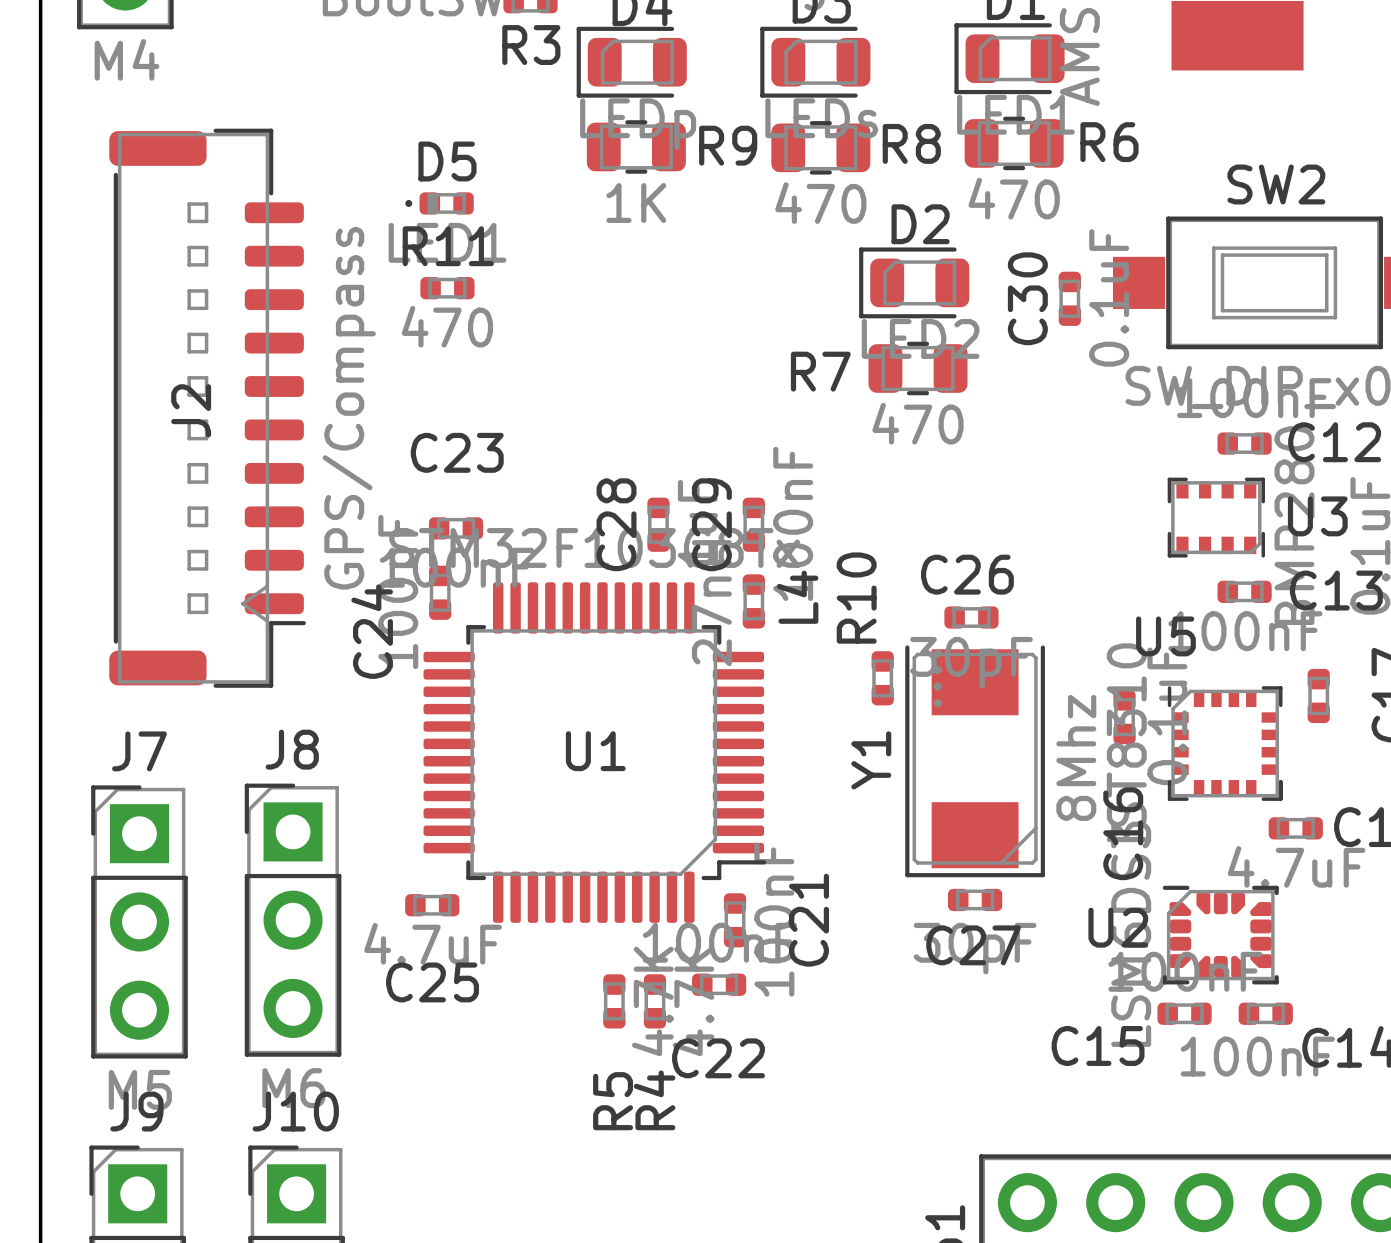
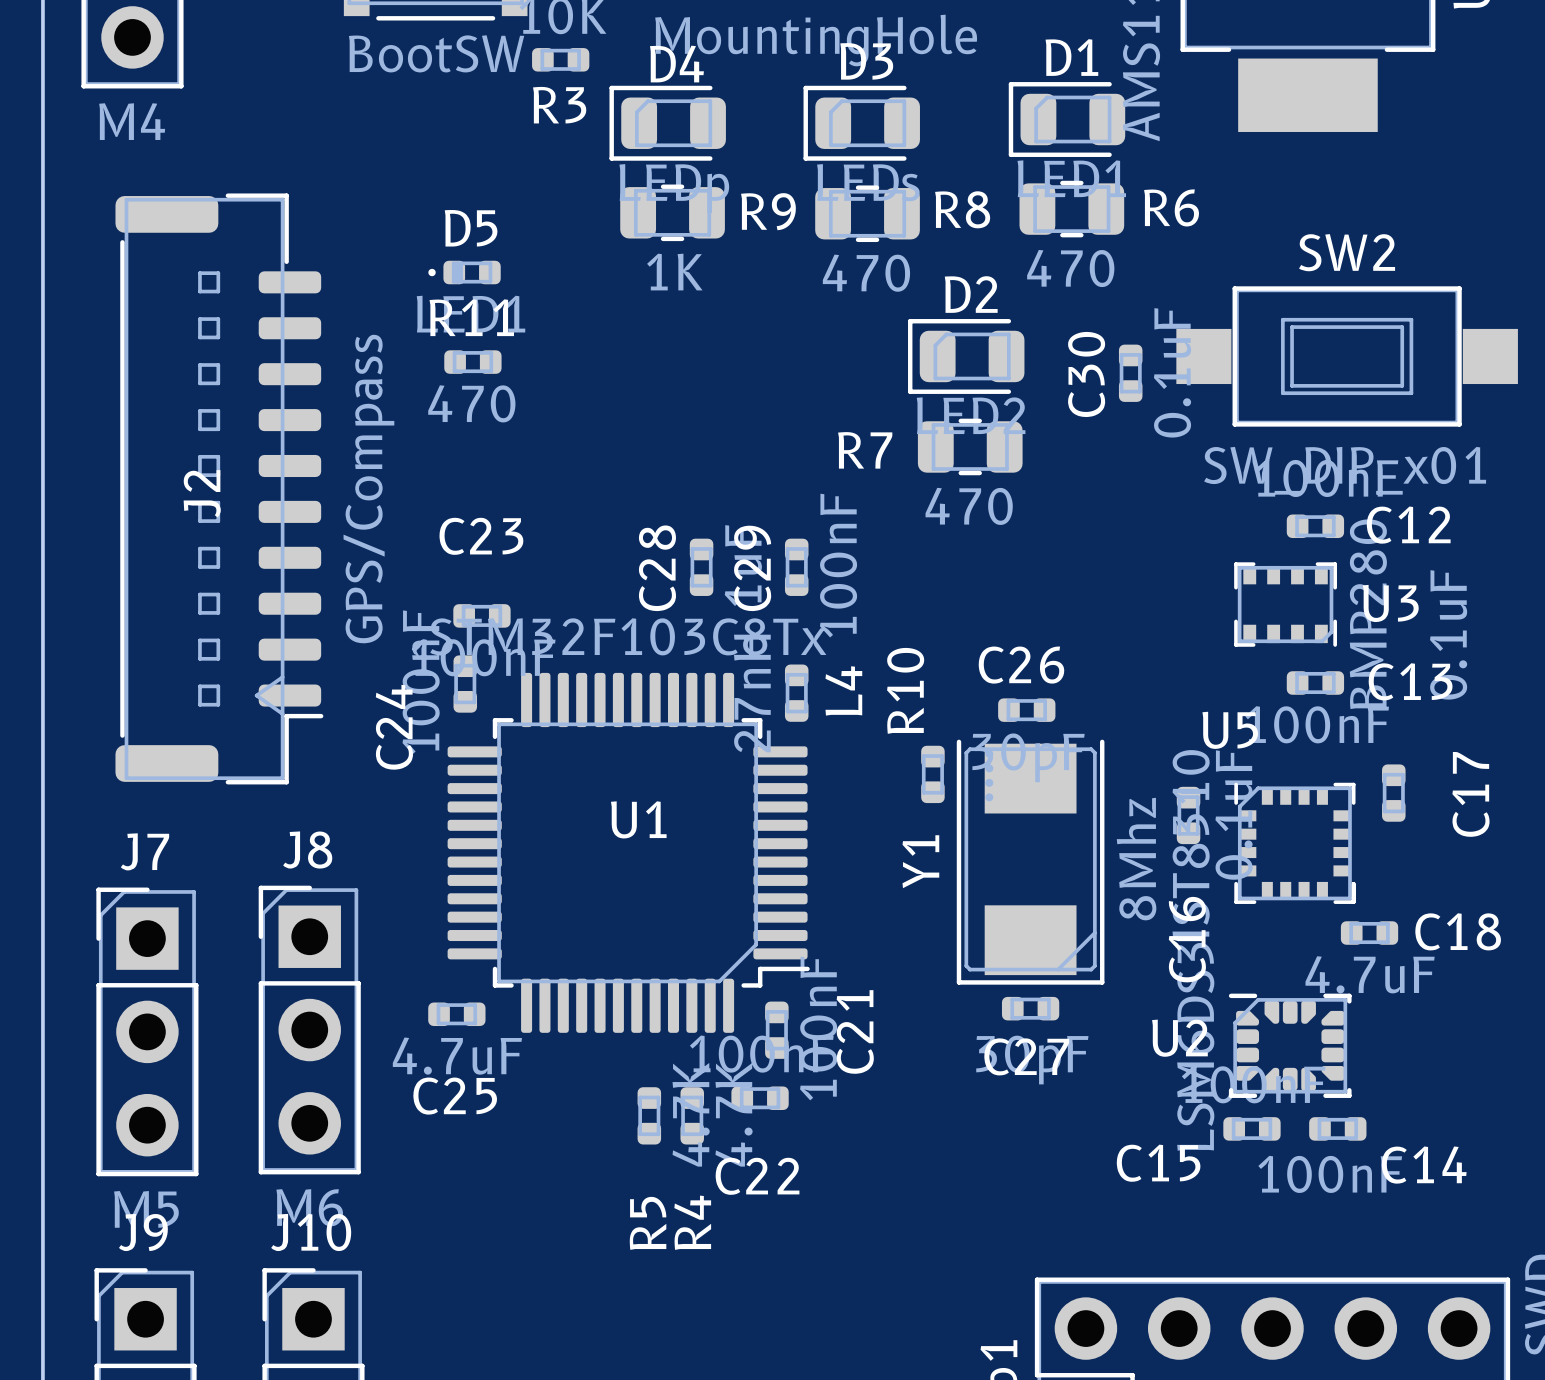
C28 position: (658, 524) -> (701, 567)
C29 position: (753, 524) -> (796, 567)
U1 name position: U1 (595, 751) -> U1 (638, 819)

